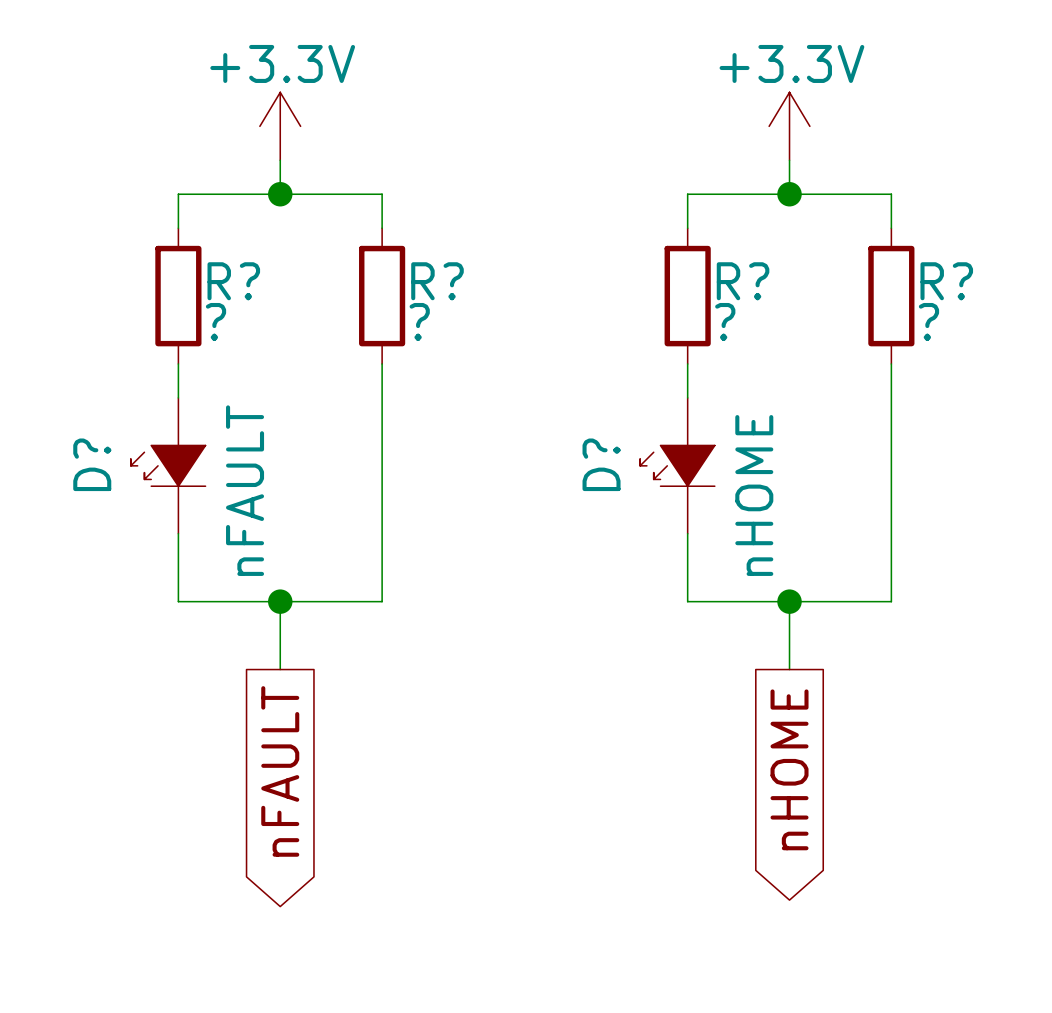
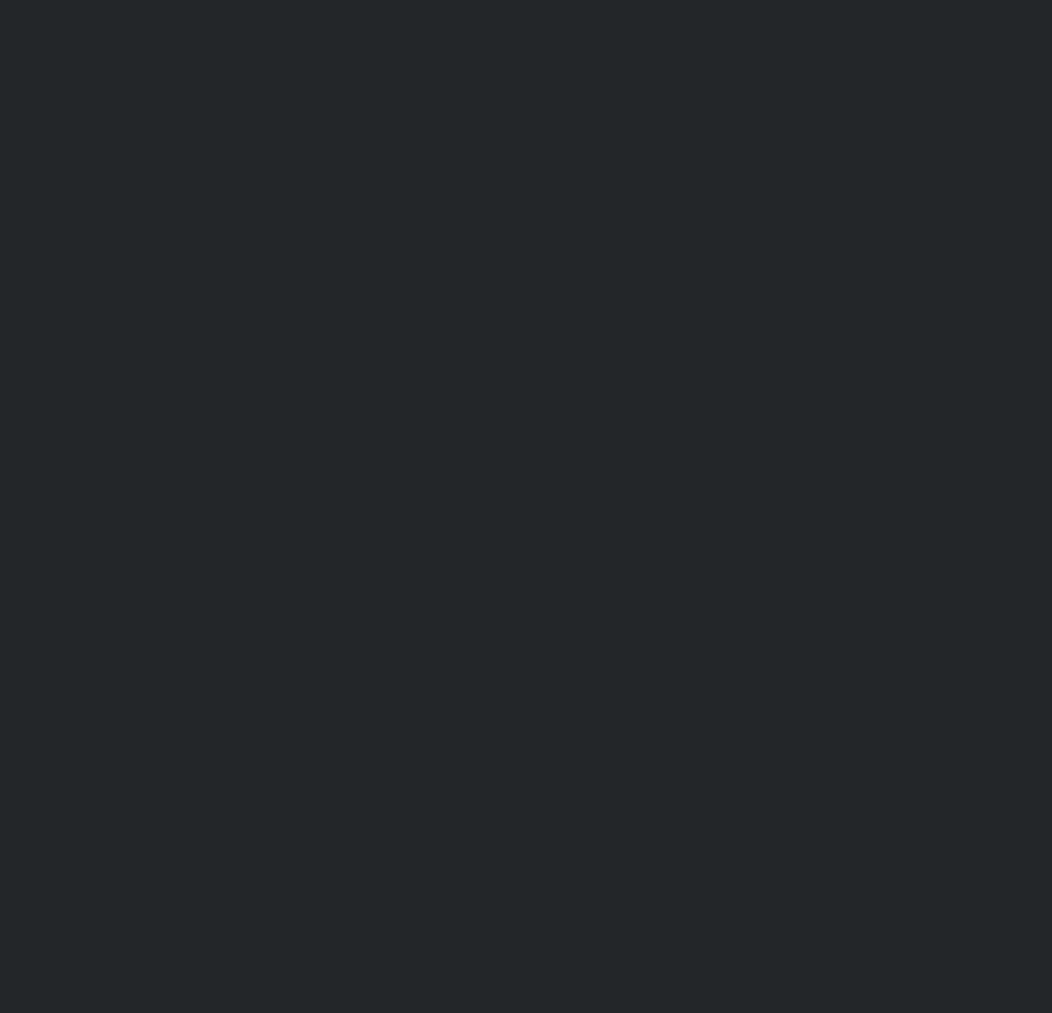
power symbol: +3.3V (280, 126) -> none
power symbol: +3.3V (789, 126) -> none
wire: (280, 160) (280, 194) -> none
wire: (789, 160) (789, 194) -> none
junction: (280, 194) -> none
junction: (789, 194) -> none
wire: (178, 228) (178, 194) (382, 194) (382, 228) -> none
wire: (687, 228) (687, 194) (891, 194) (891, 228) -> none
R?: ? (178, 296) -> none
R?: ? (382, 296) -> none
R?: ? (687, 296) -> none
R?: ? (891, 296) -> none
wire: (178, 363) (178, 397) -> none
wire: (382, 363) (382, 601) (178, 601) (178, 533) -> none
wire: (687, 363) (687, 397) -> none
wire: (891, 363) (891, 601) (687, 601) (687, 533) -> none
D?: nFAULT (168, 465) -> none
D?: nHOME (677, 465) -> none
wire: (280, 601) (280, 669) -> none
junction: (280, 601) -> none
wire: (789, 601) (789, 669) -> none
junction: (789, 601) -> none
global label: nHOME (789, 769) -> none
global label: nFAULT (280, 771) -> none

